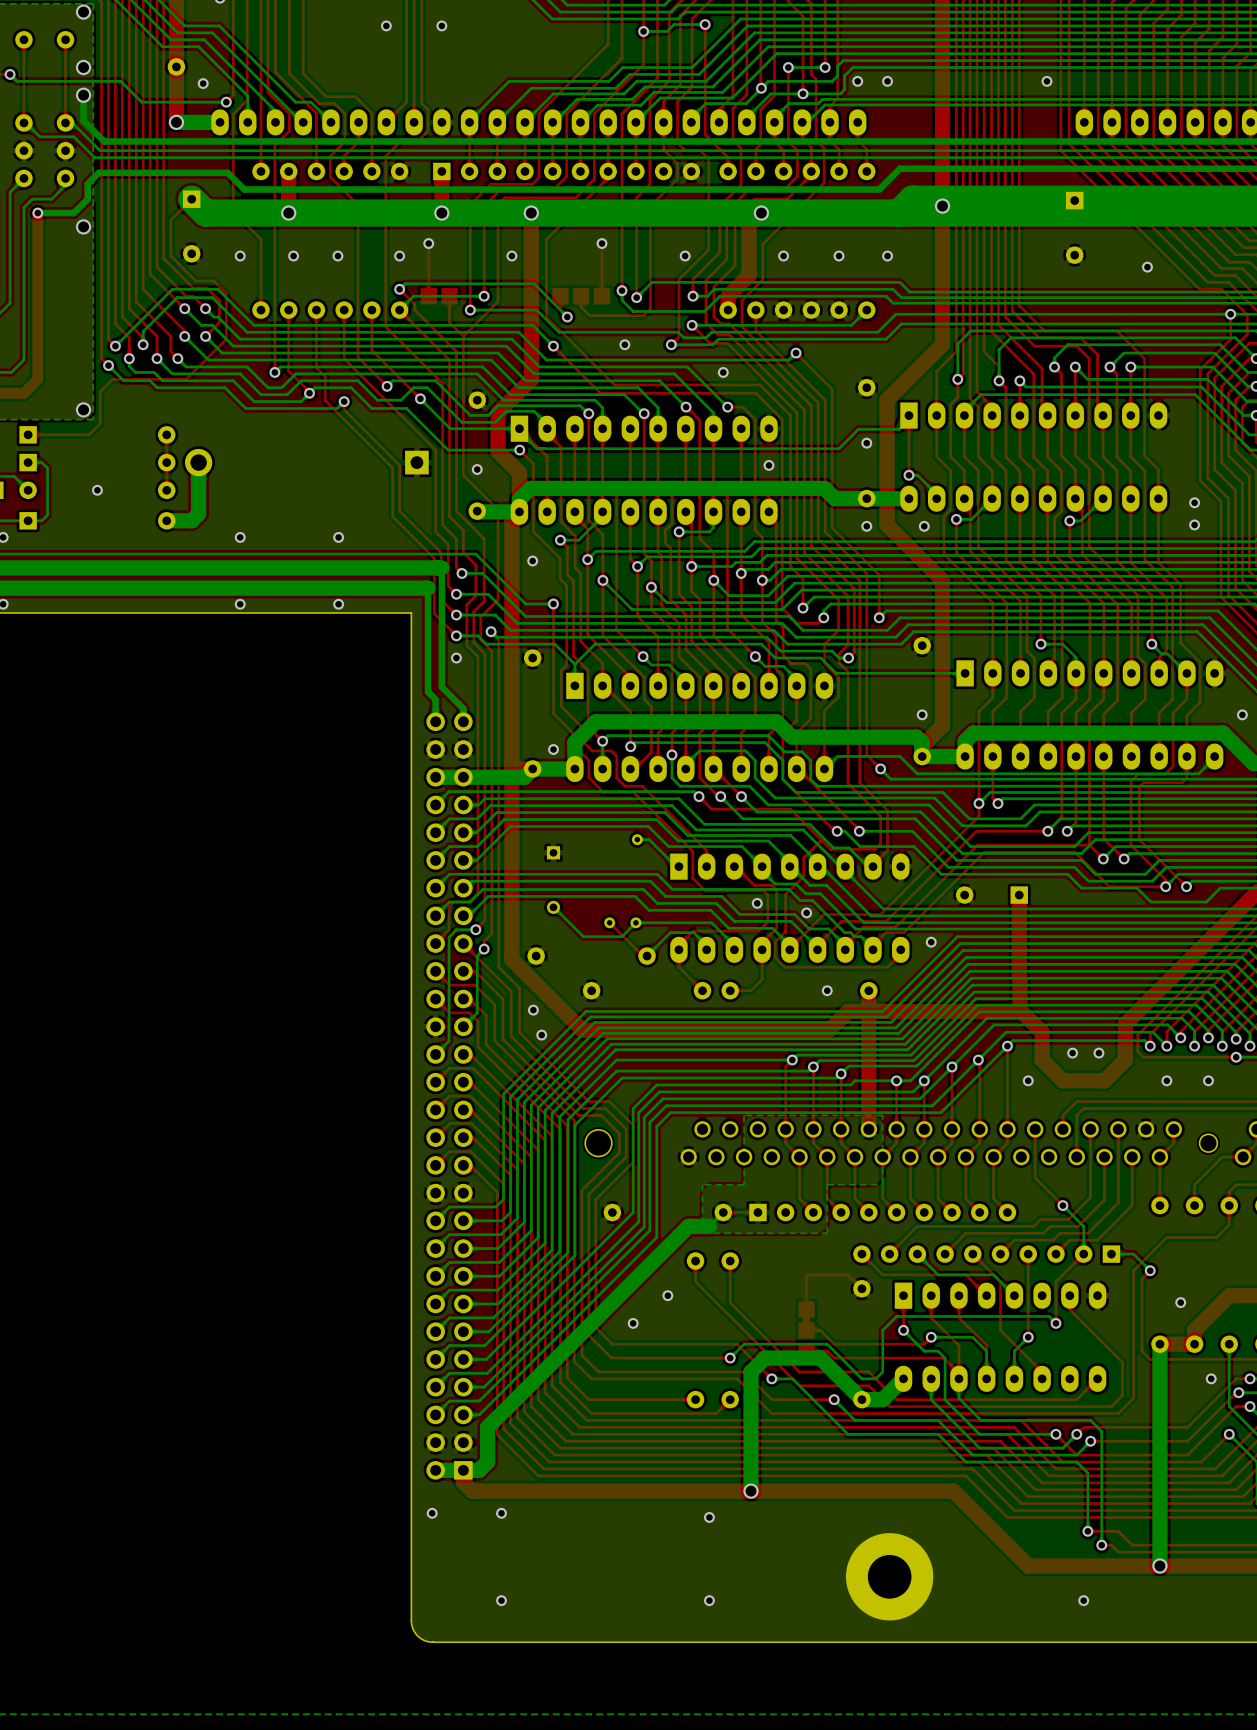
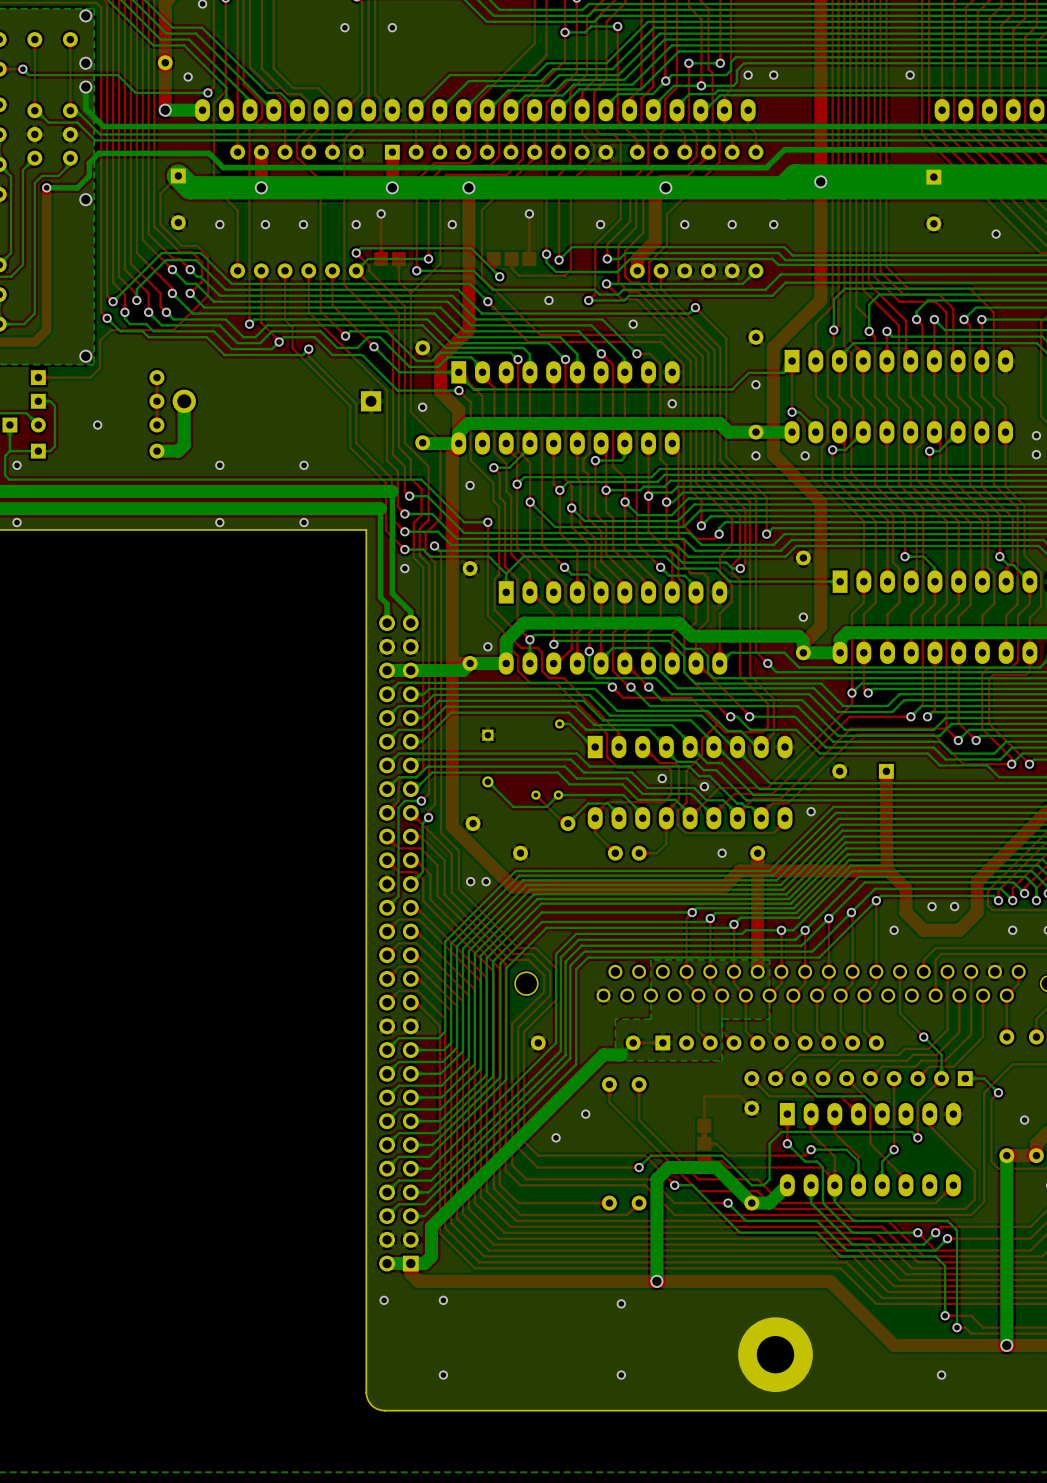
via: (533, 1010) -> none
via: none -> (470, 881)
via: none -> (486, 881)
via: (541, 1035) -> none

